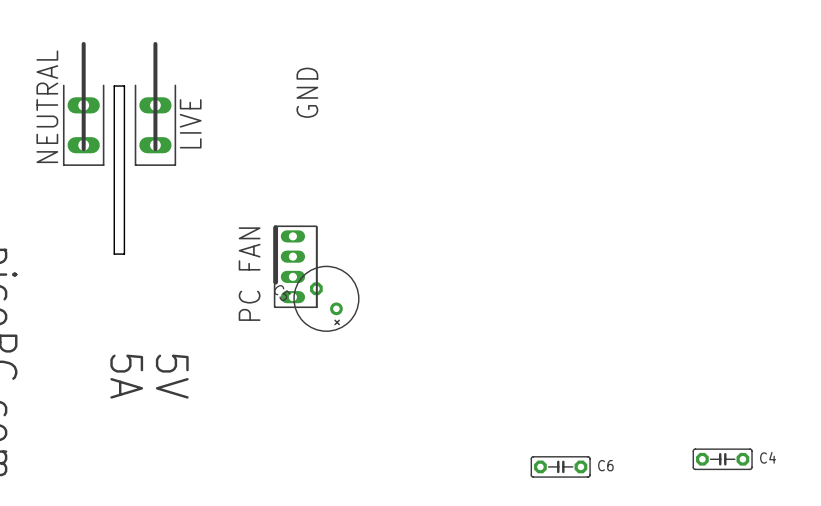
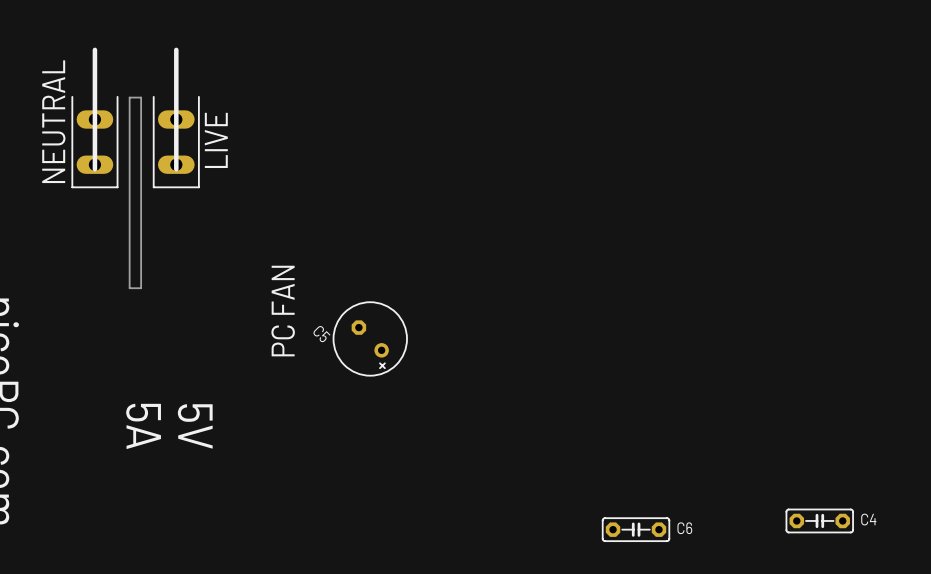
text: GND (307, 92) -> none
part: (295, 266) -> none

